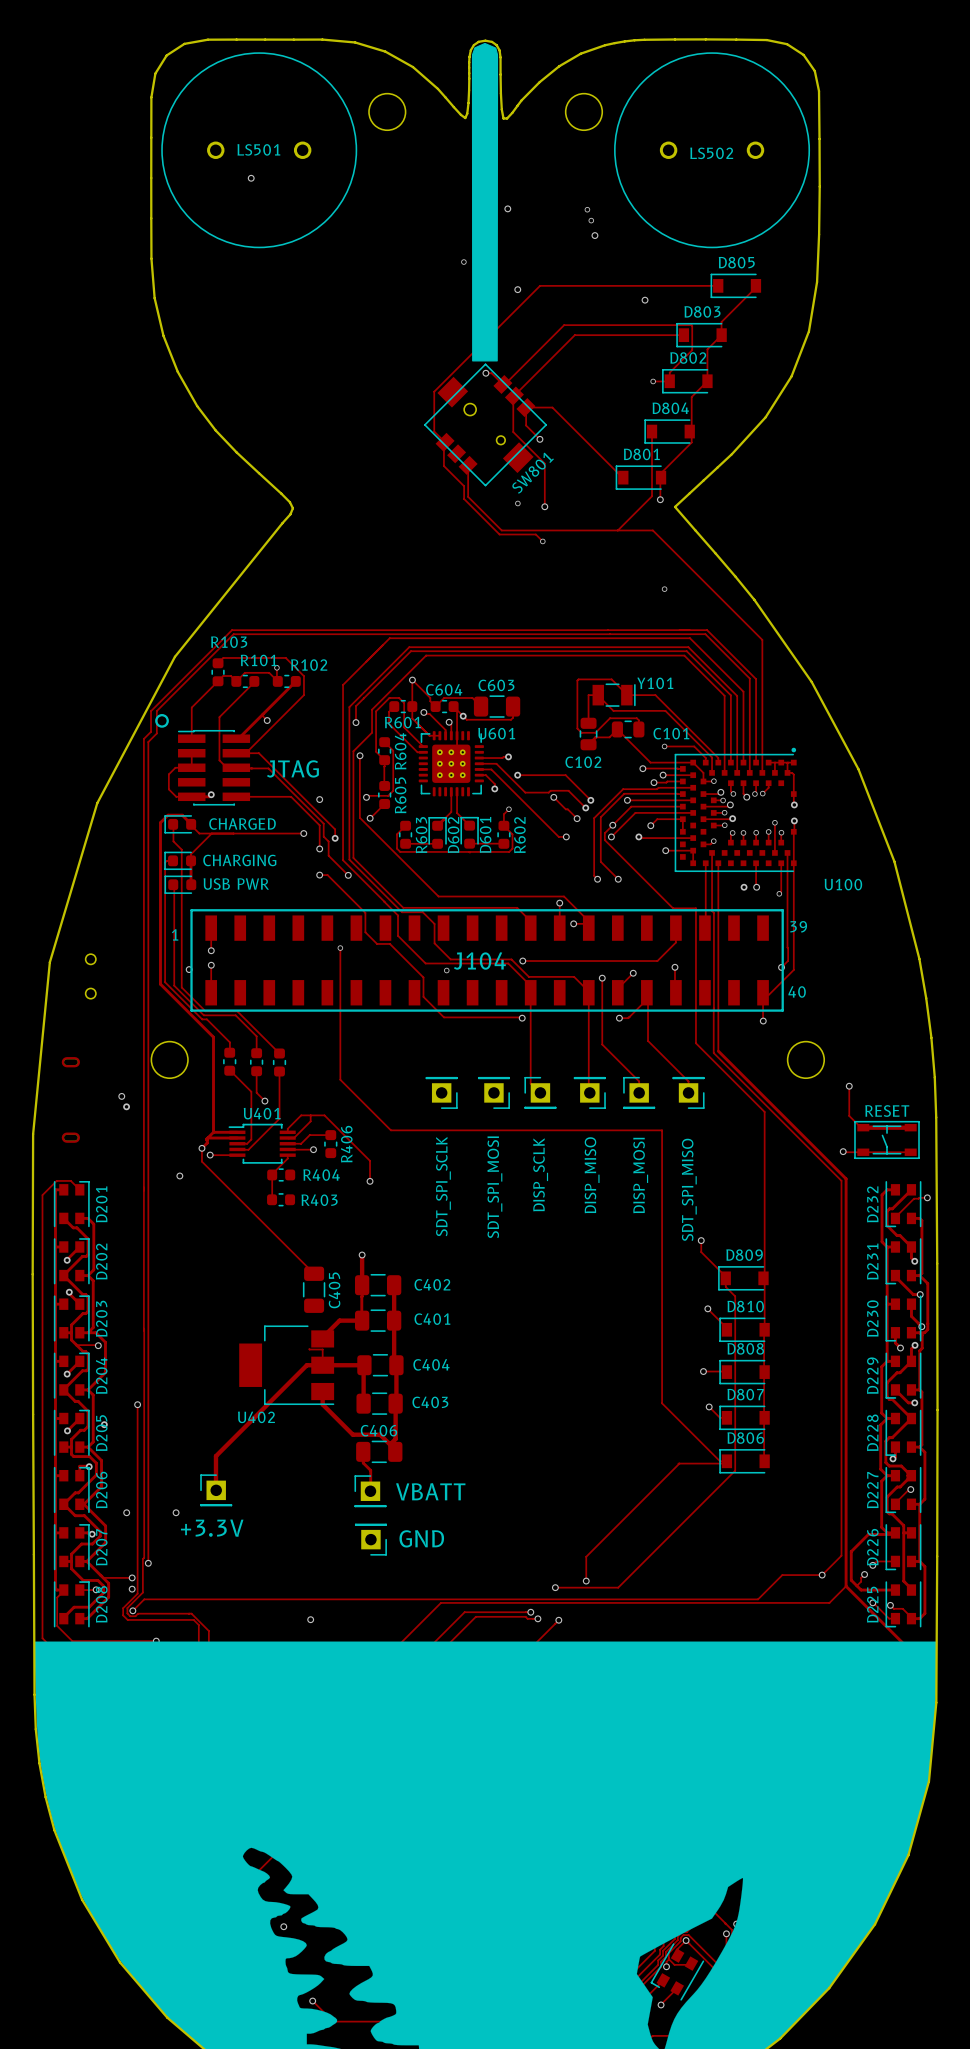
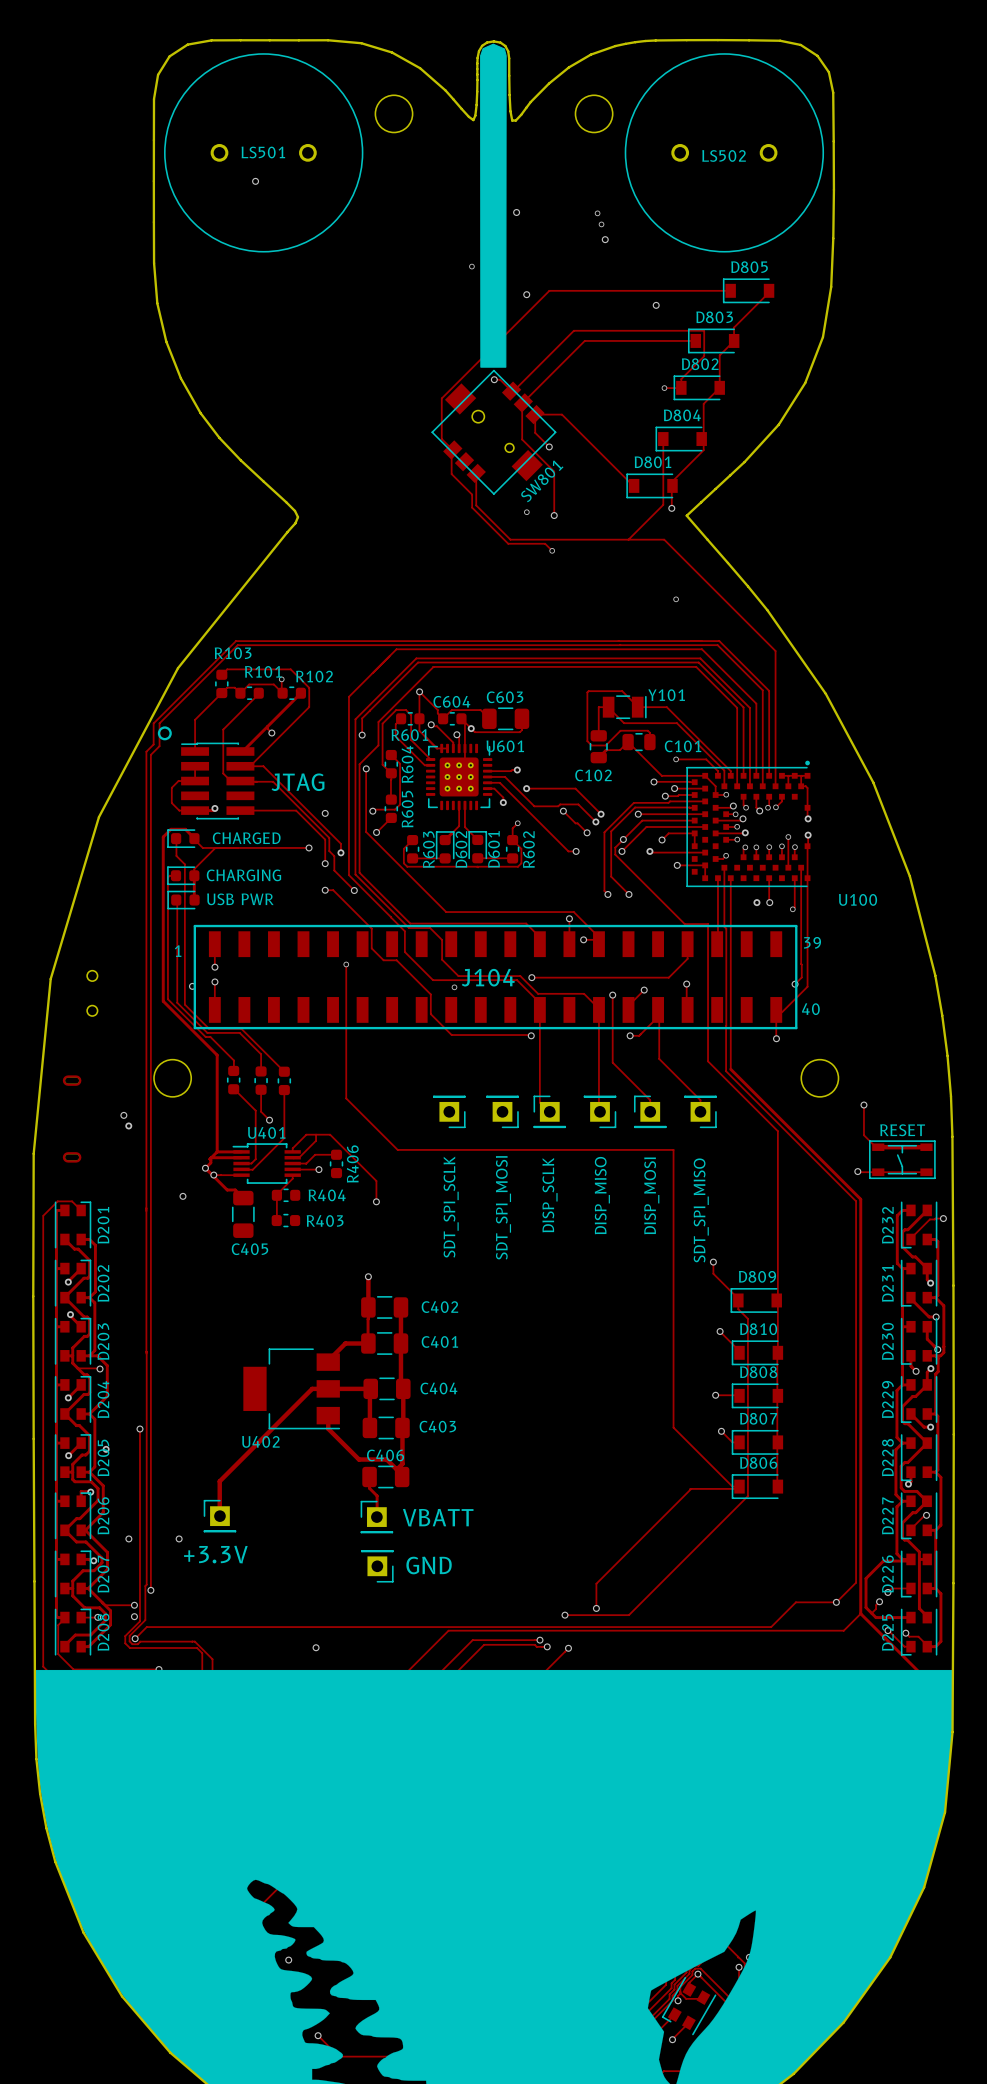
track: (201, 1148) (201, 1161) (314, 1273) -> (205, 1168) (227, 1190) (235, 1190) (243, 1198)
C405 position: (314, 1289) -> (243, 1214)
C405 name rotation: 0° (334, 1290) -> 90° clockwise (249, 1249)
track: (309, 1349) (322, 1349) (322, 1365) -> none

